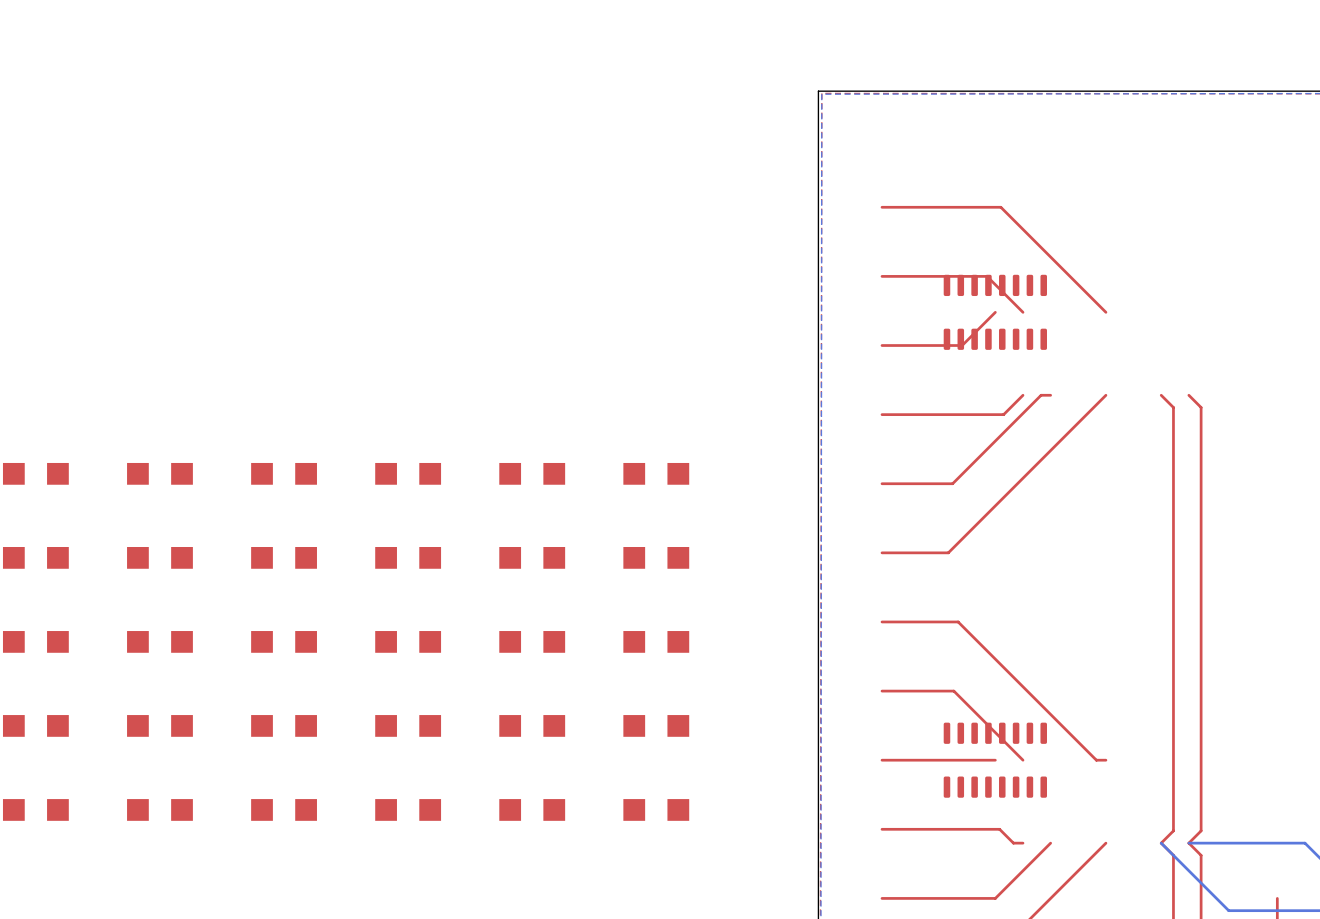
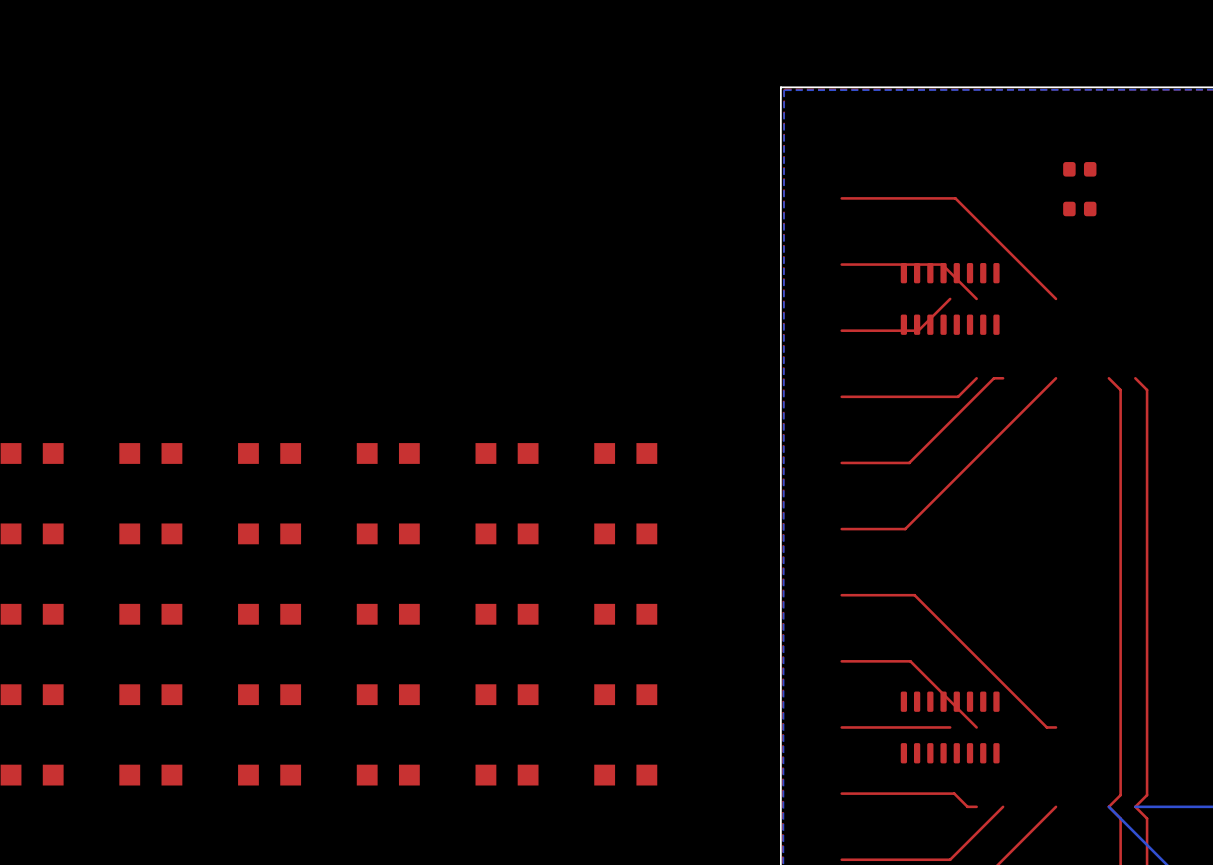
part: none -> (1079, 169)
part: none -> (1079, 208)

